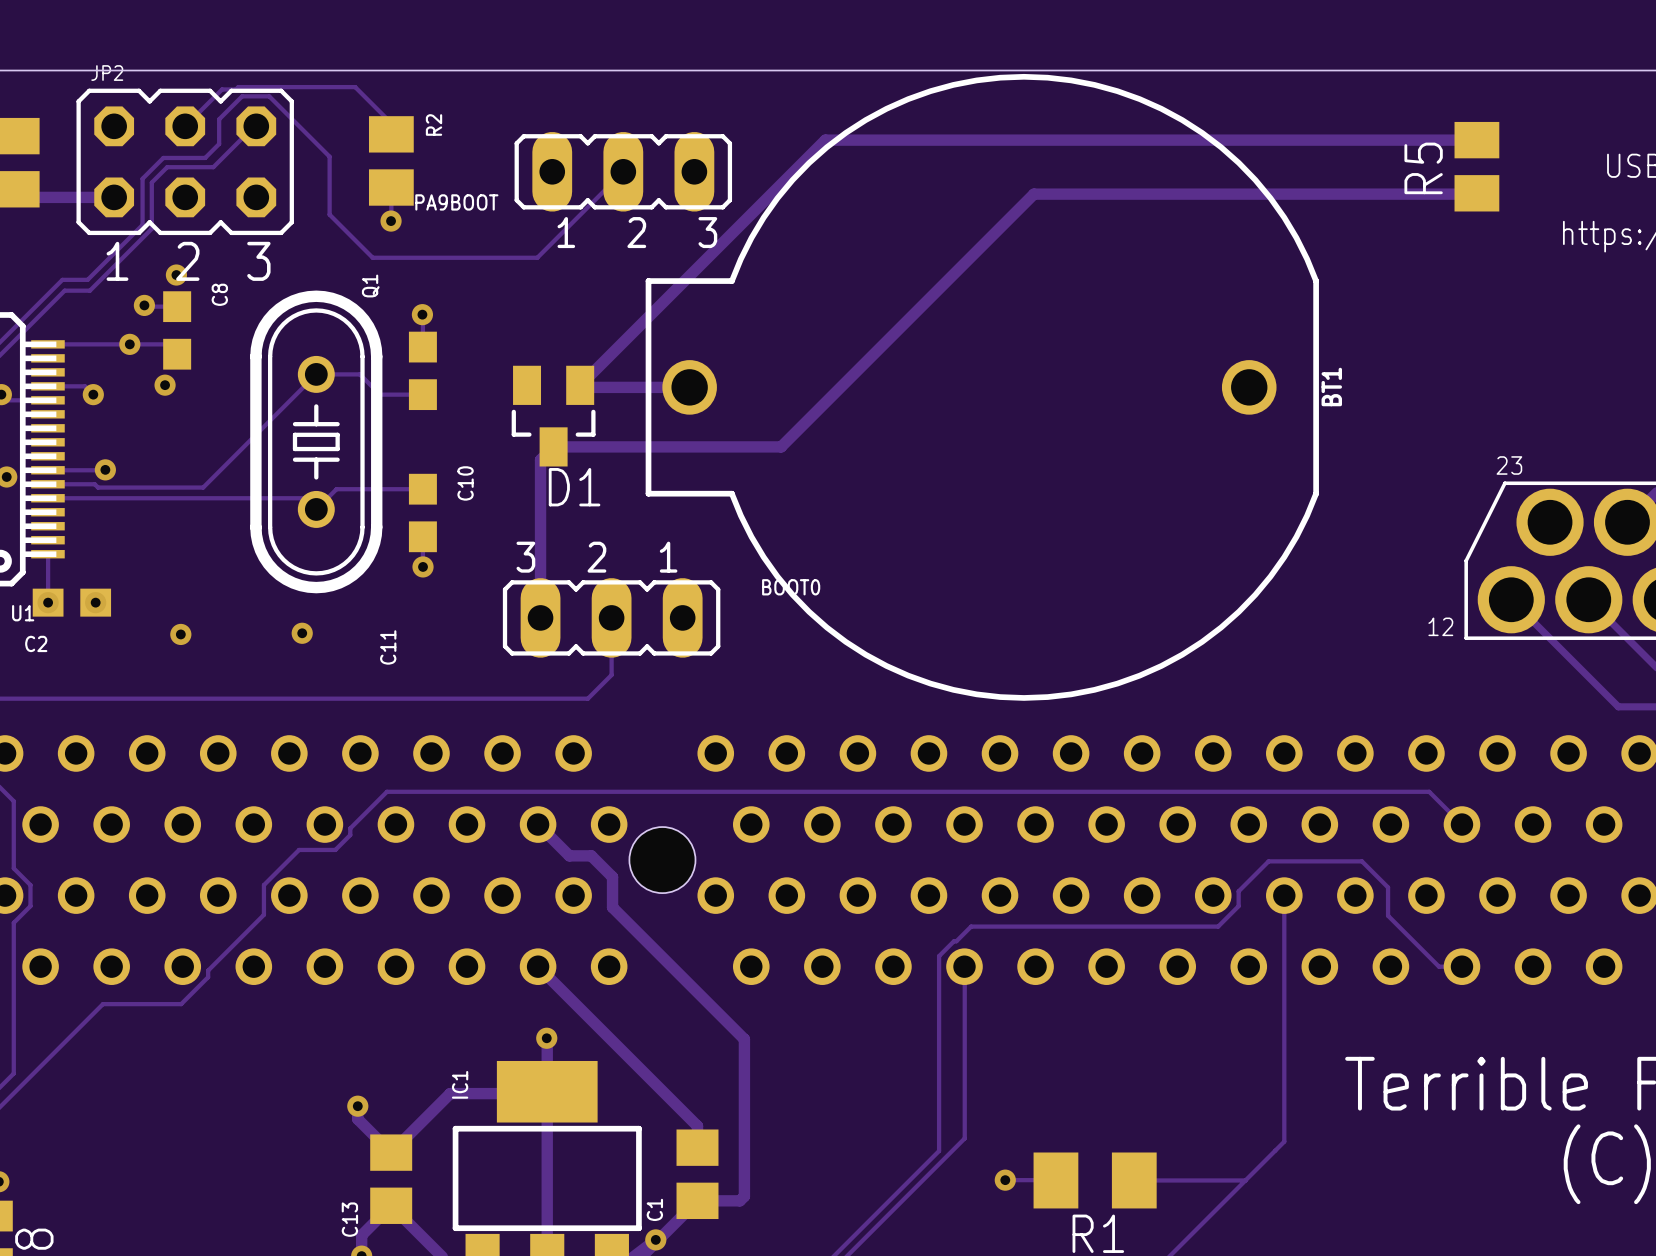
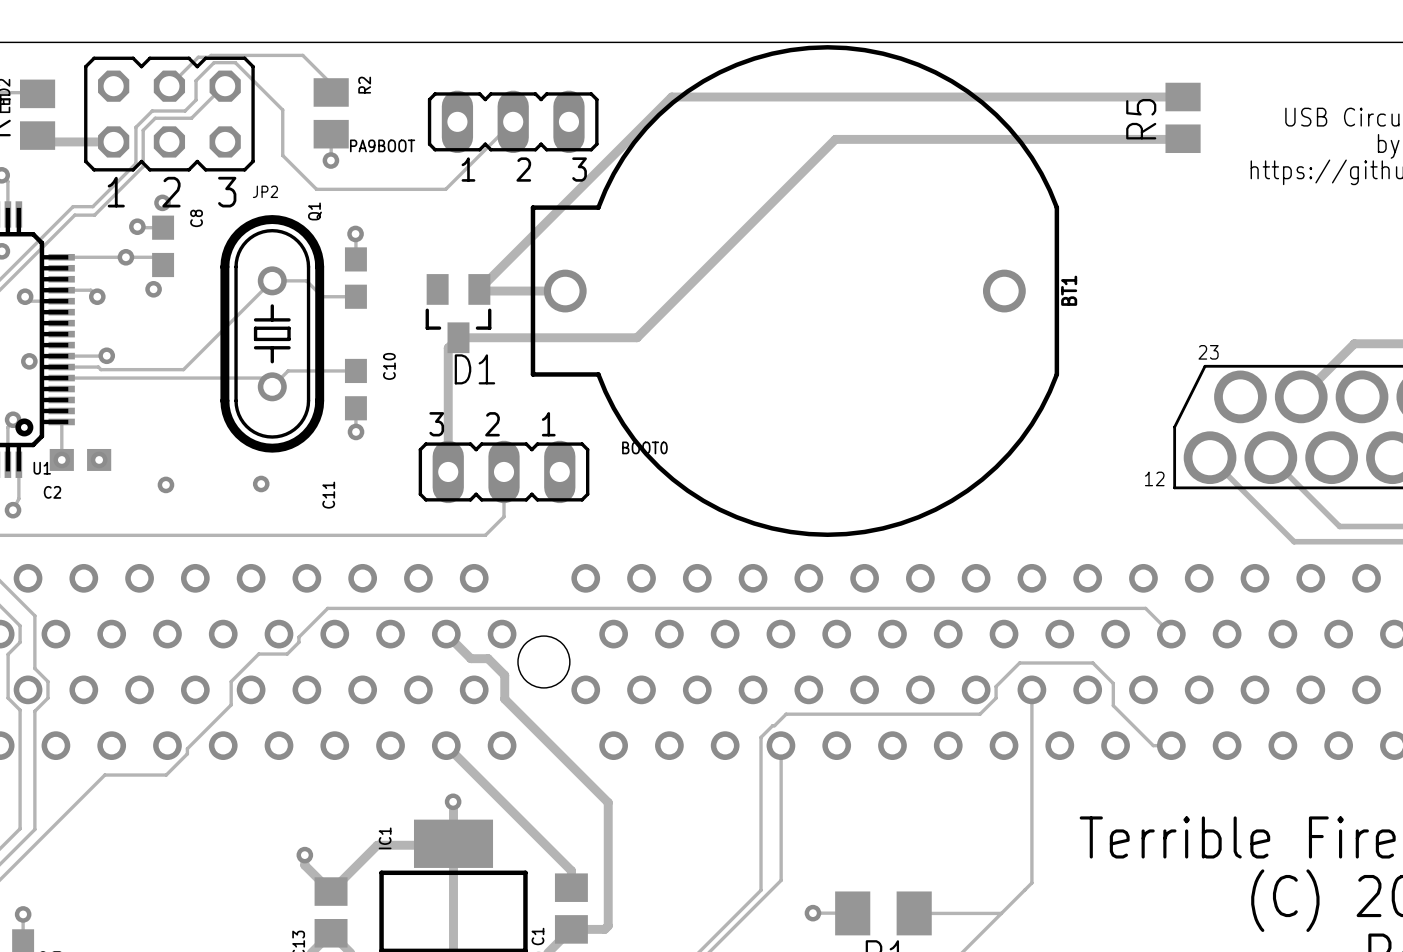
JP2 name position: JP2 (107, 73) -> JP2 (265, 191)

